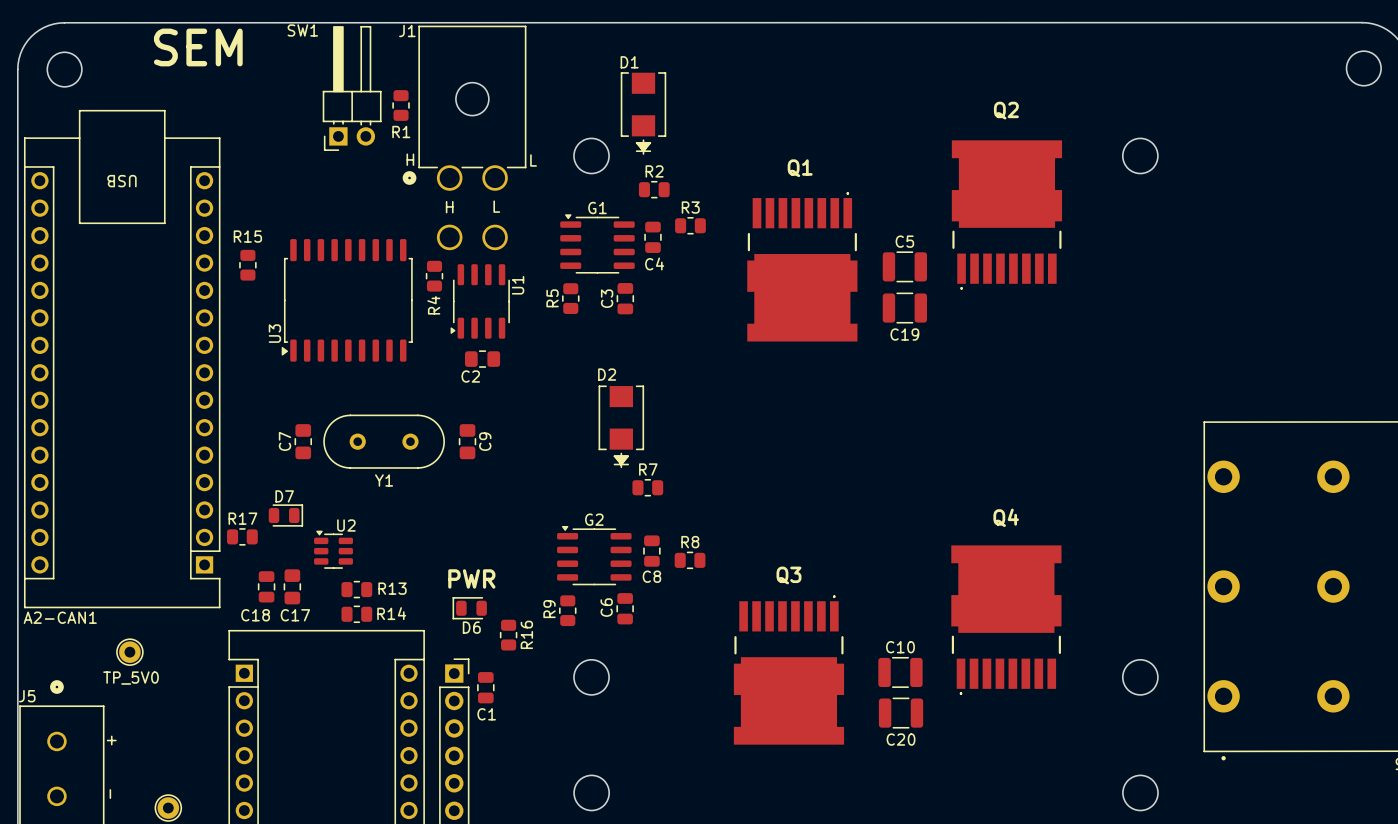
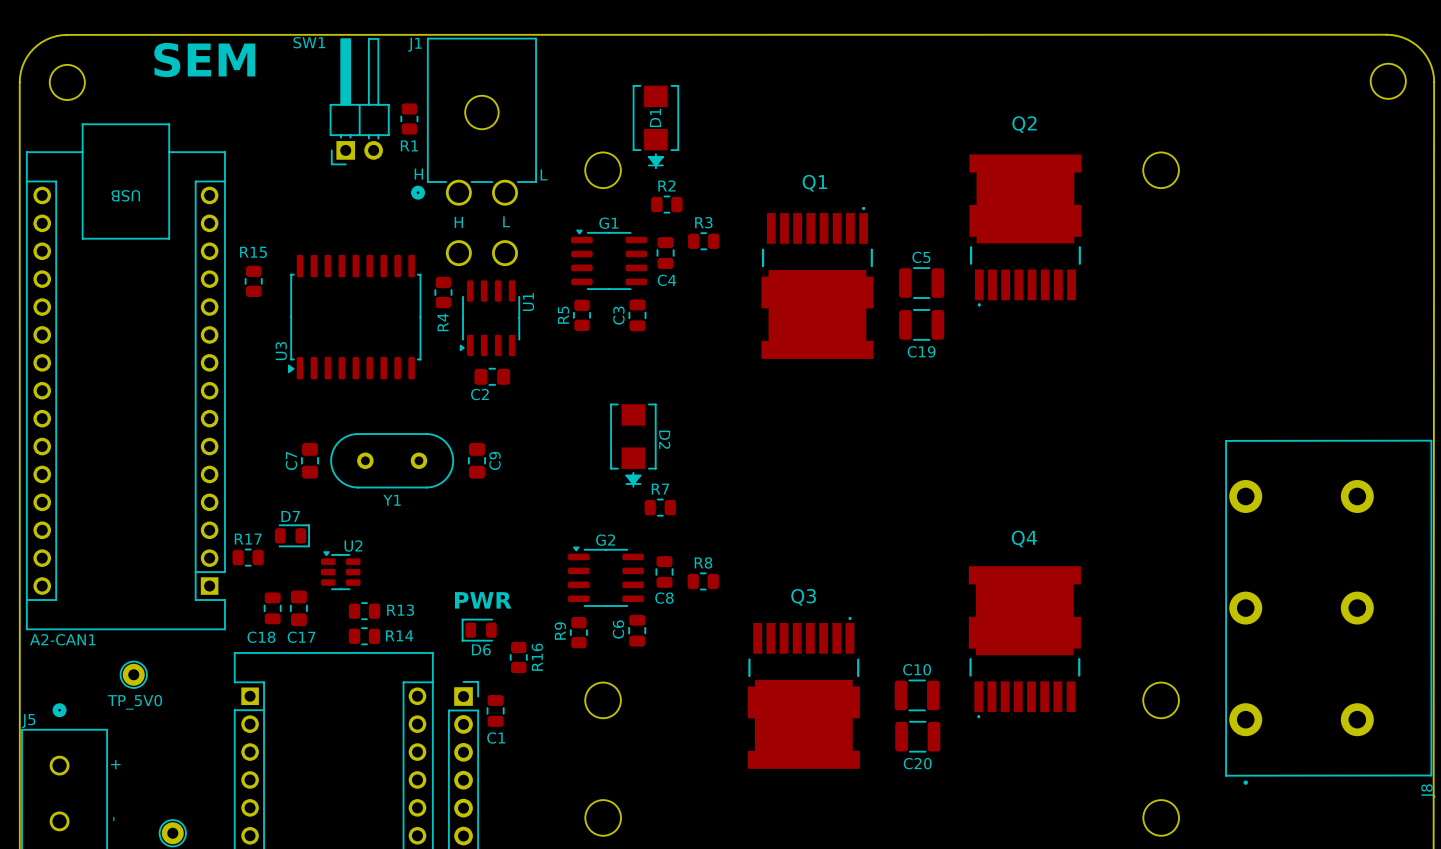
D1 name rotation: 0° (629, 62) -> 90° counterclockwise (655, 117)
D1 name position: D1 (629, 62) -> D1 (655, 117)
D2 name rotation: 0° (607, 374) -> 90° clockwise (664, 439)
D2 name position: D2 (607, 374) -> D2 (664, 439)

